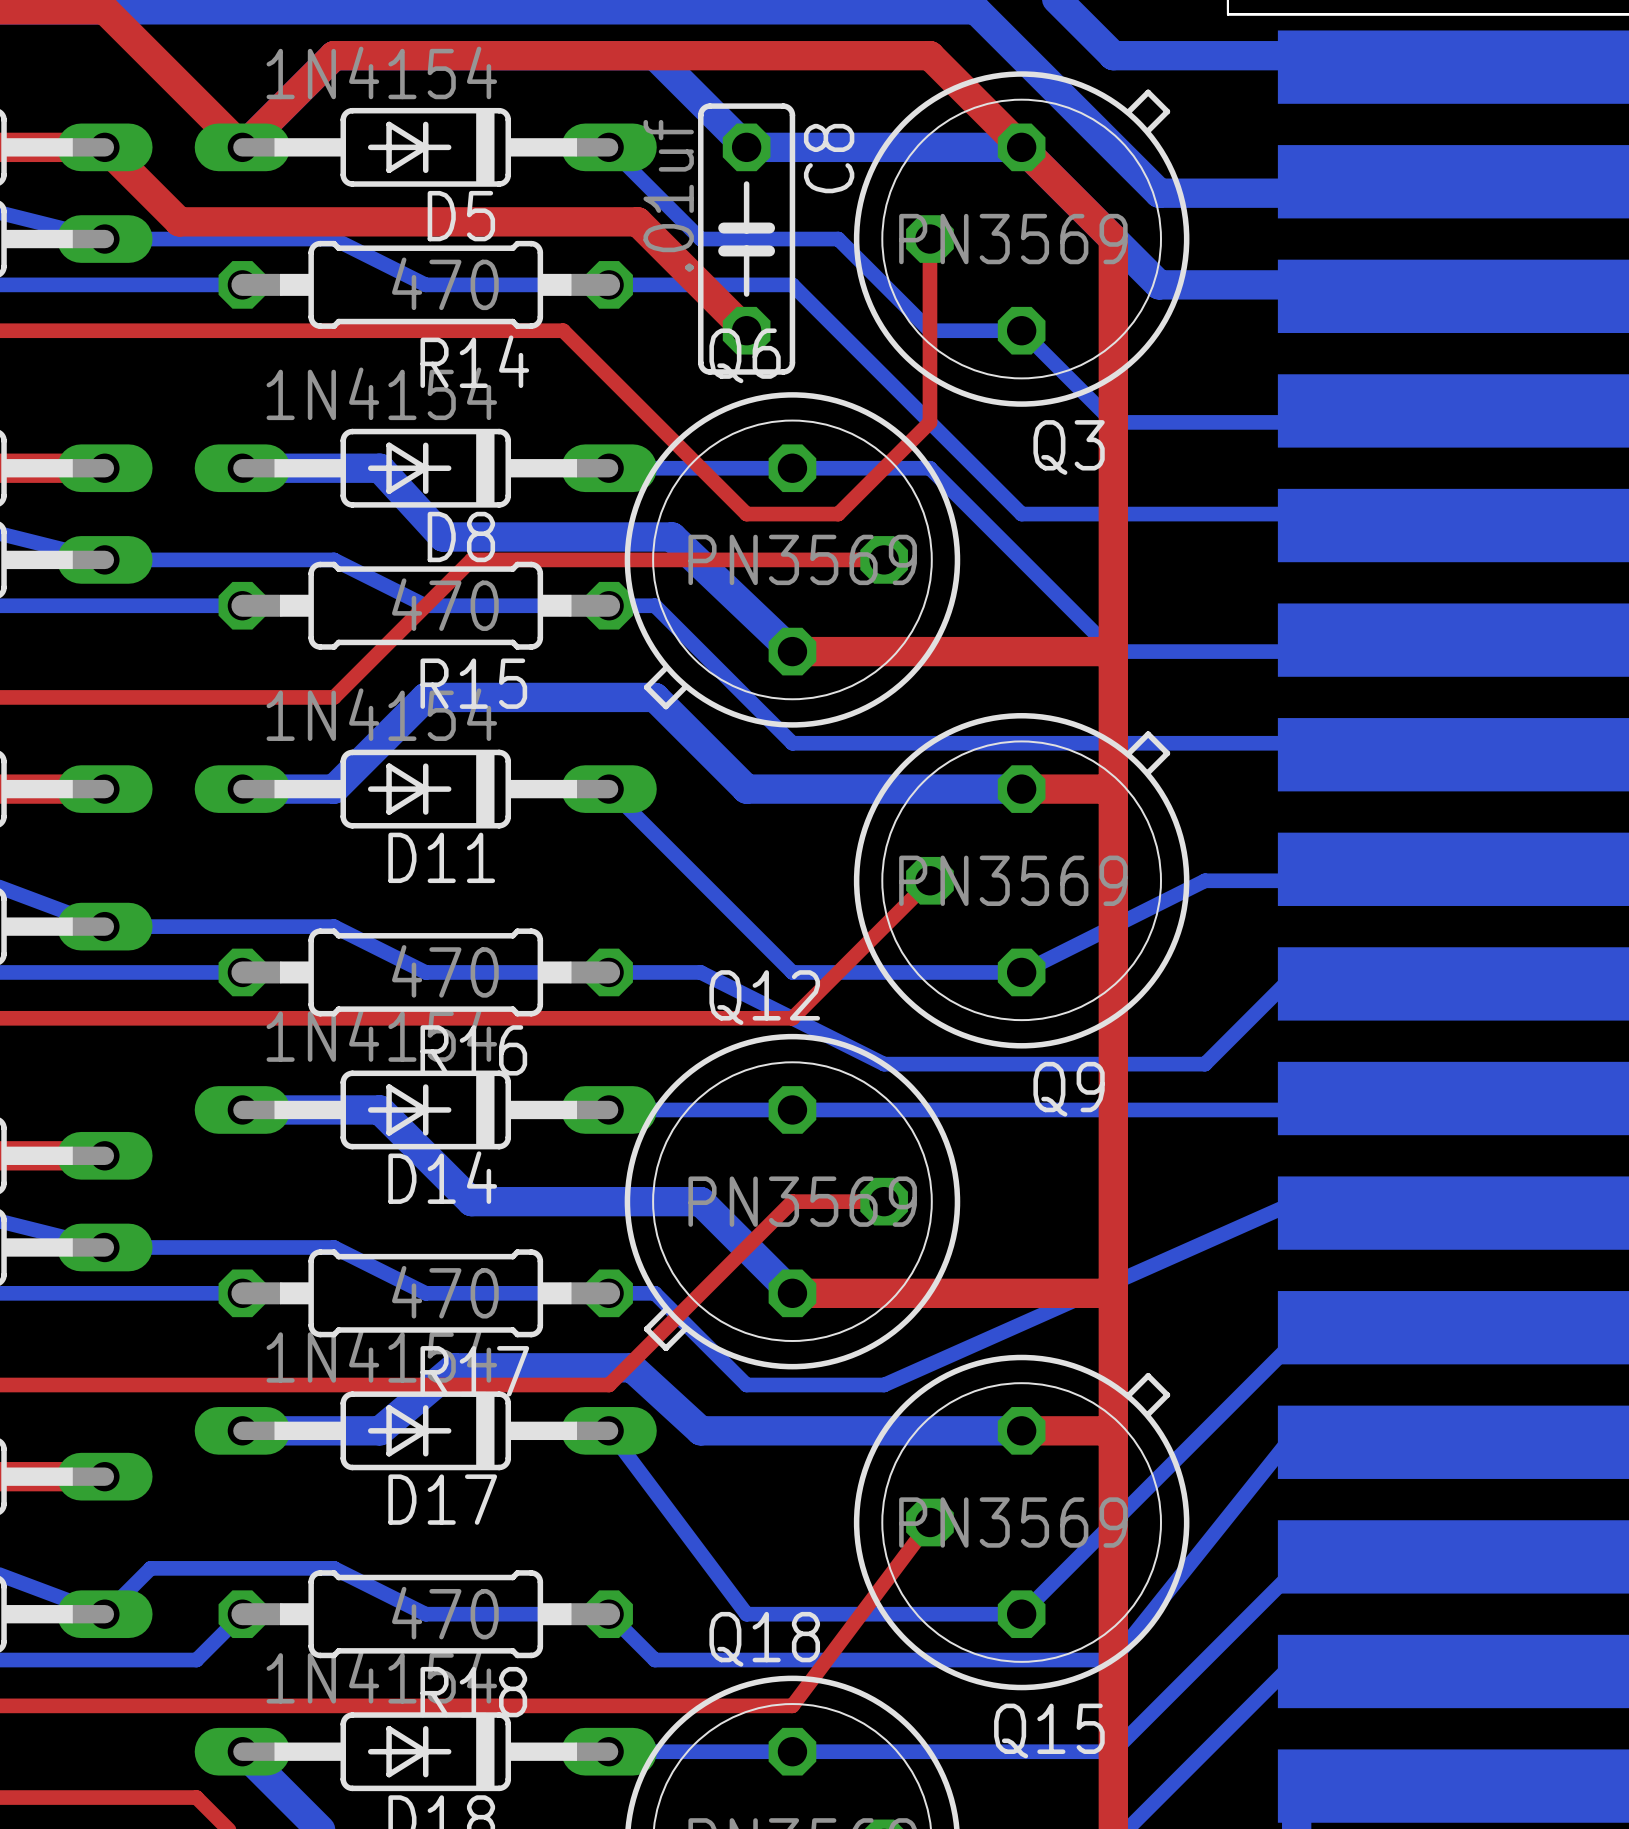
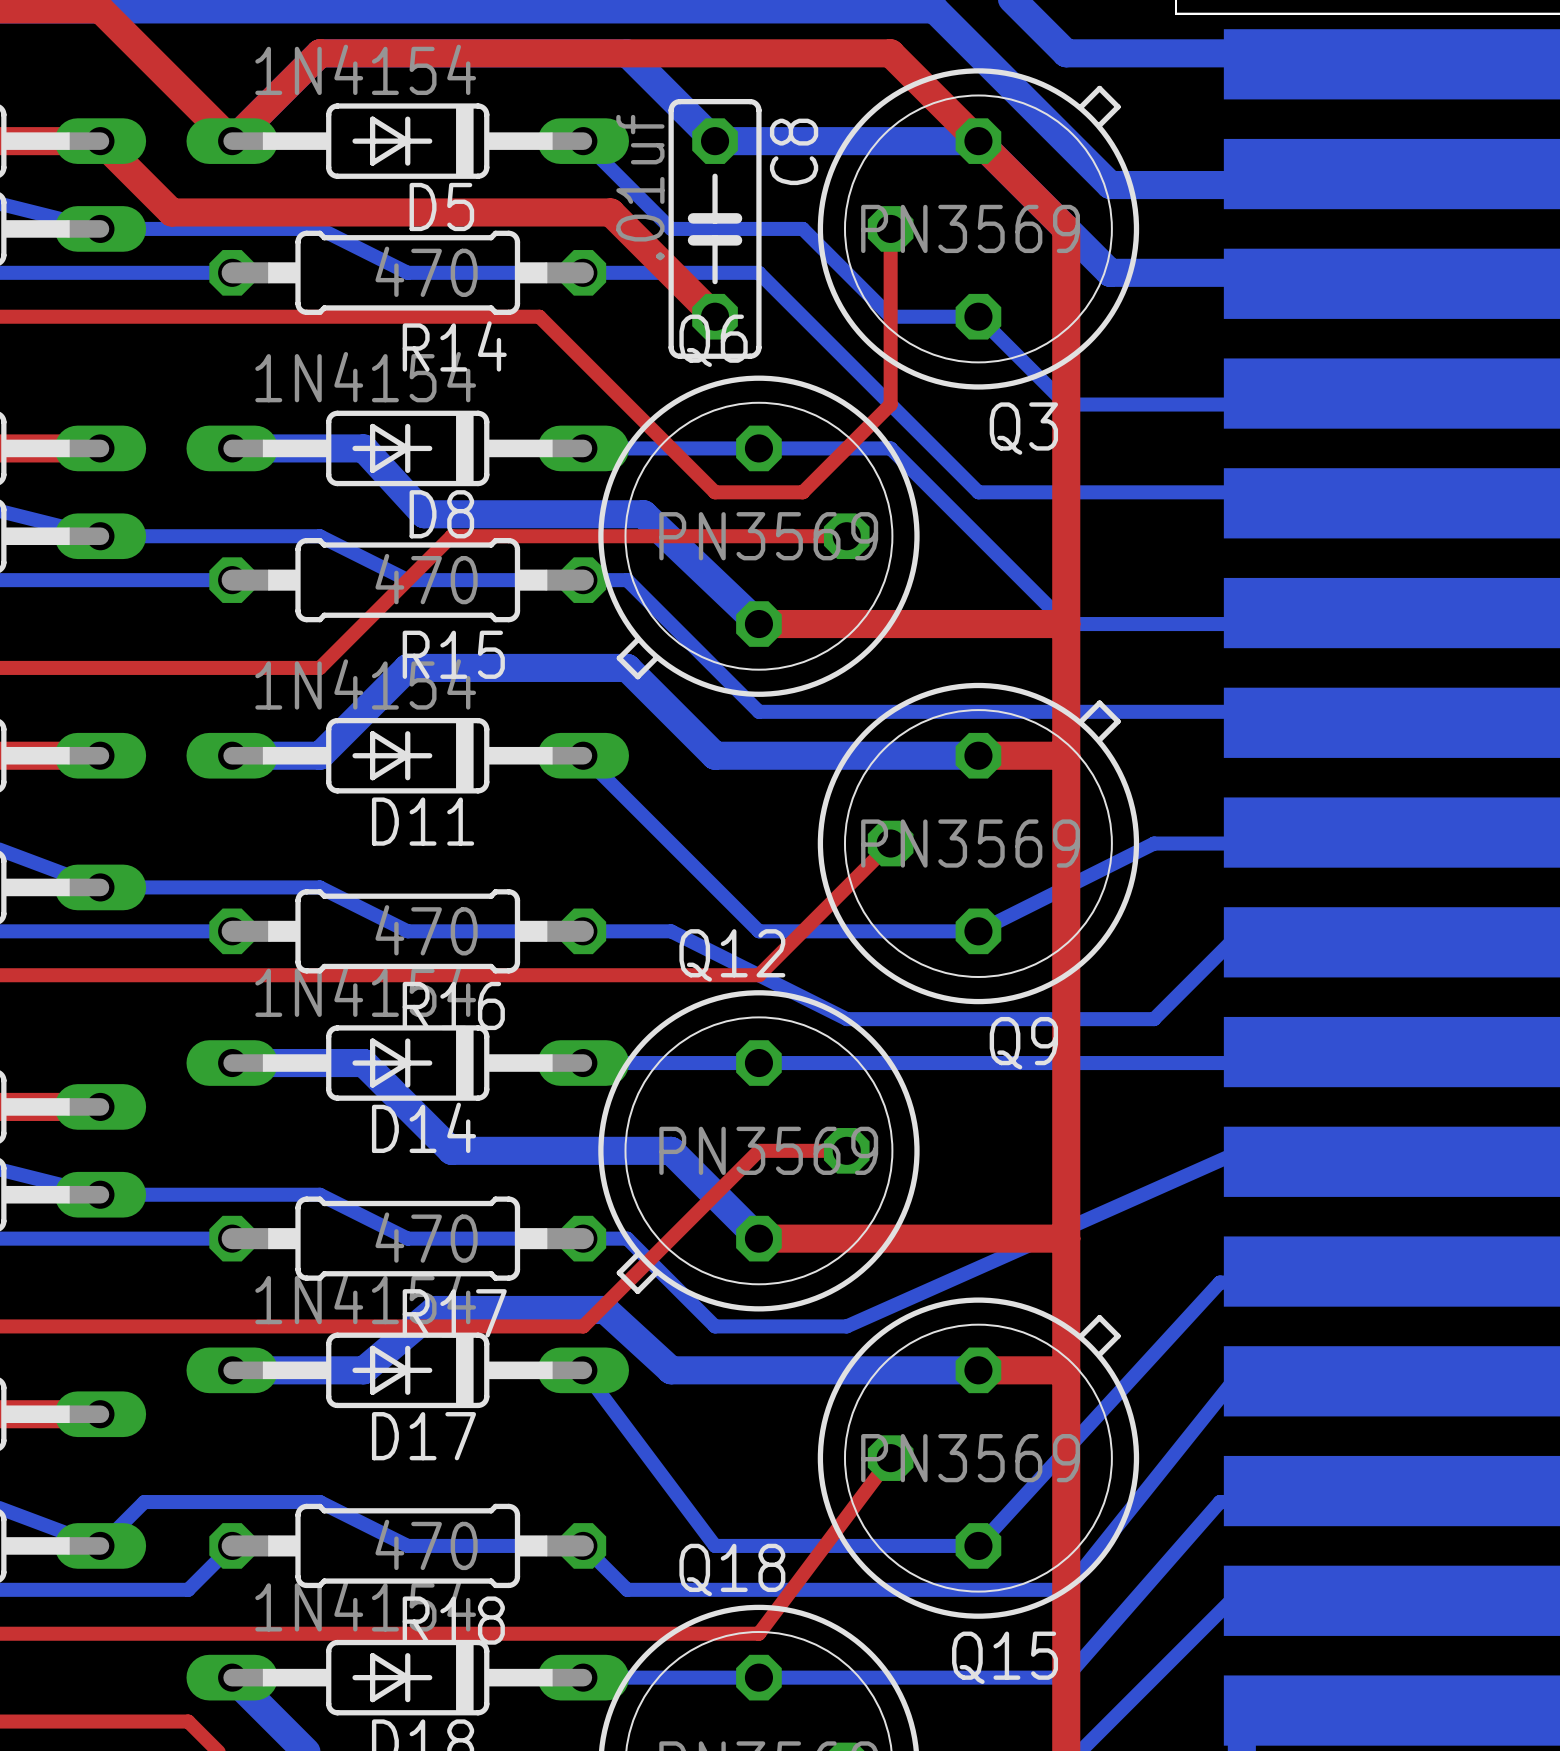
bottom track: (1296, 1339) (1021, 1614) -> (1241, 1282) (1219, 1282) (978, 1545)
bottom track: (1296, 1568) (1113, 1751) -> (1241, 1502) (1219, 1502) (1066, 1677)

